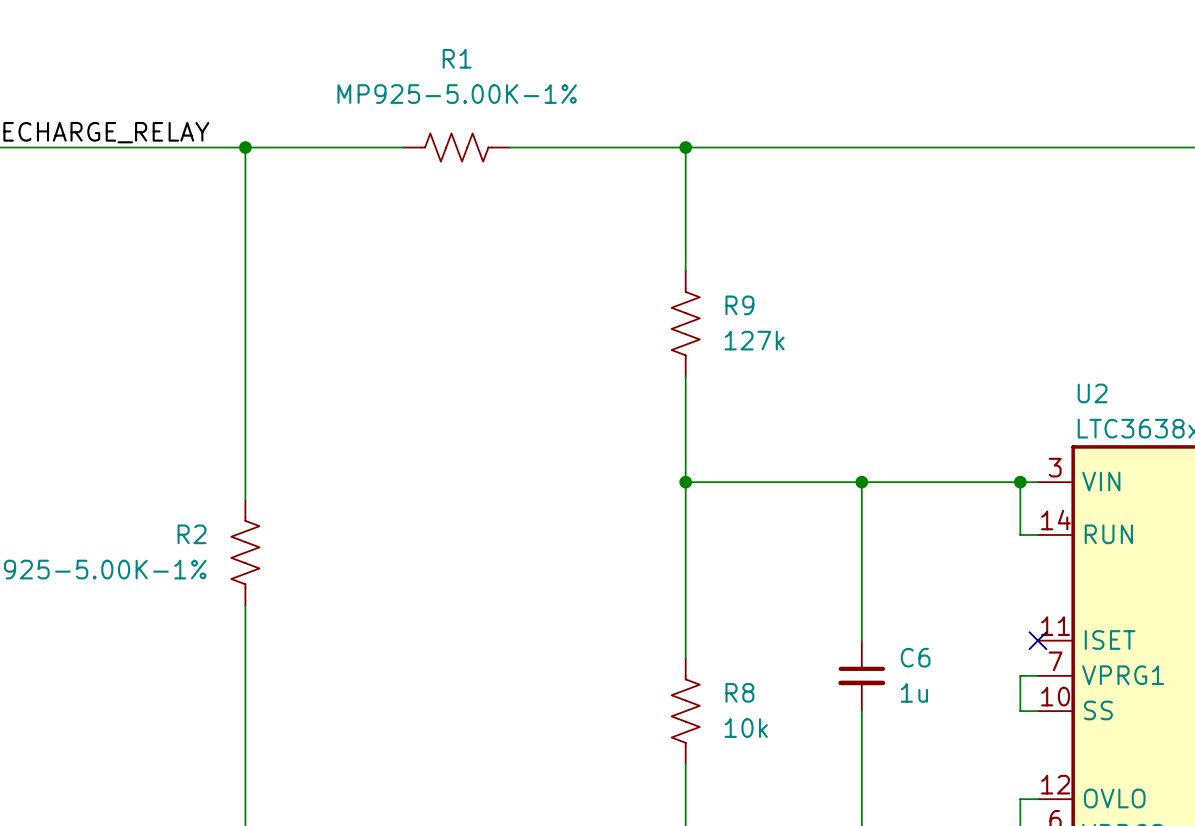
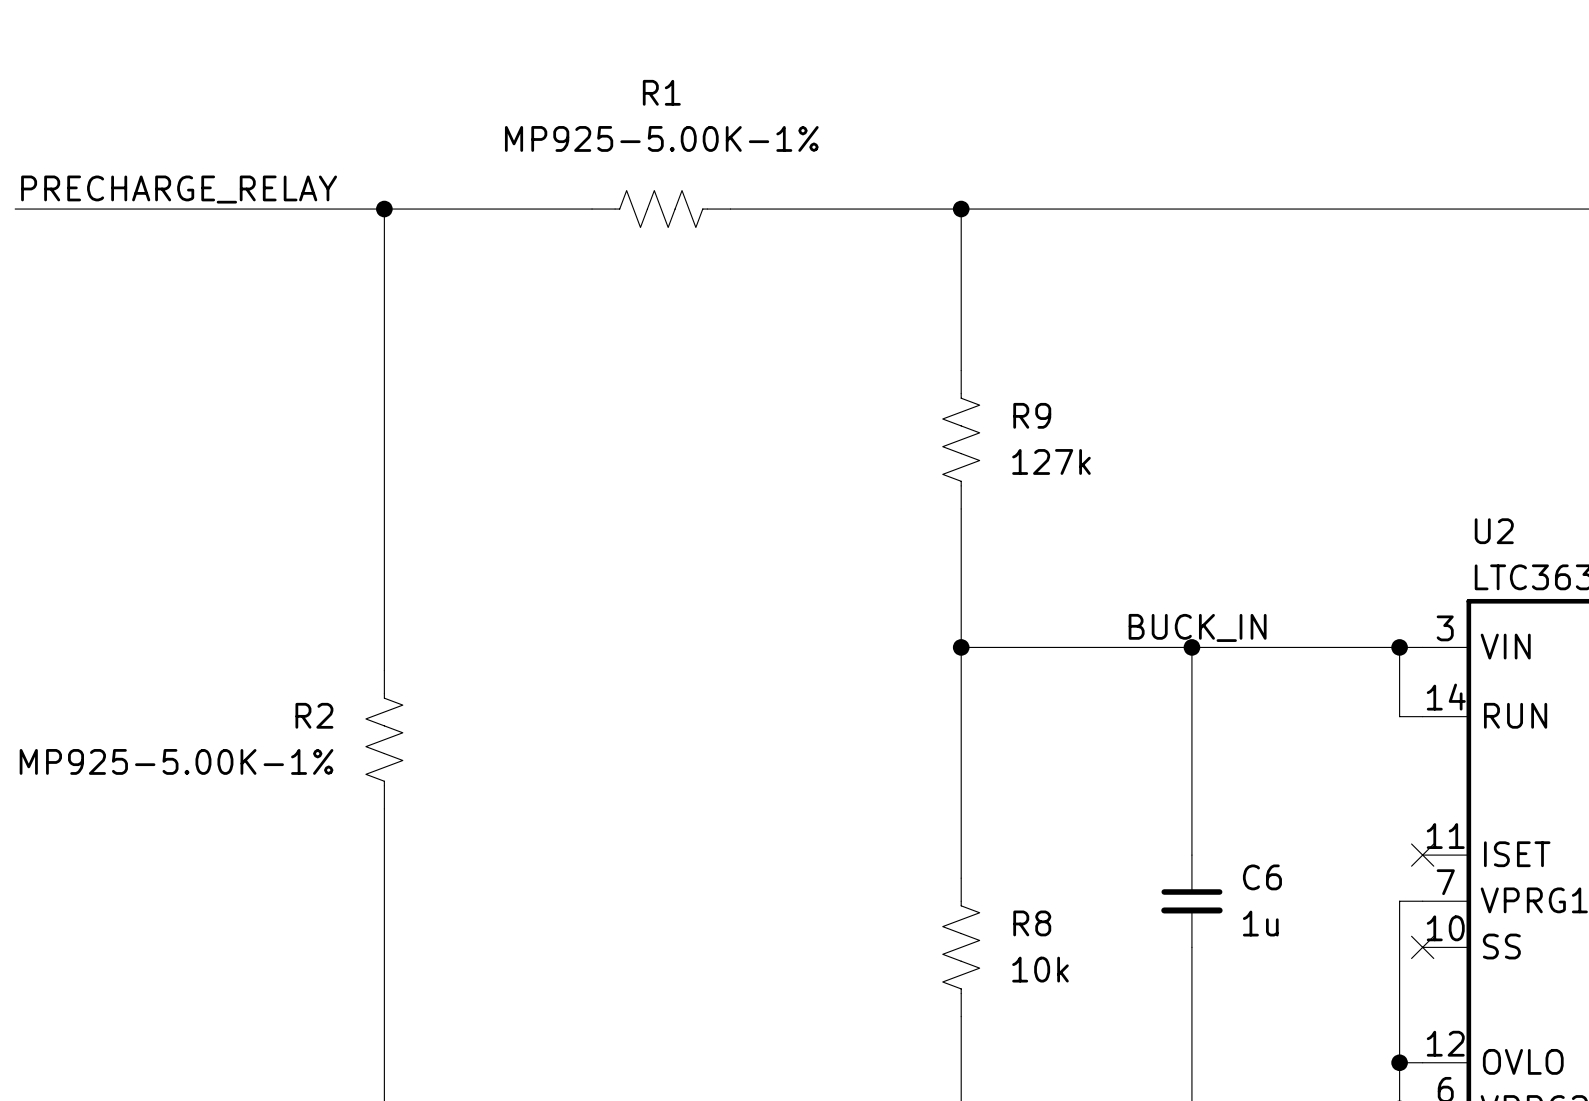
label: none -> BUCK_IN (1197, 627)
wire: (1020, 711) (1037, 711) -> (1399, 947) (1399, 1062)
no-connect mark: none -> (1422, 947)
junction: none -> (1399, 1062)

